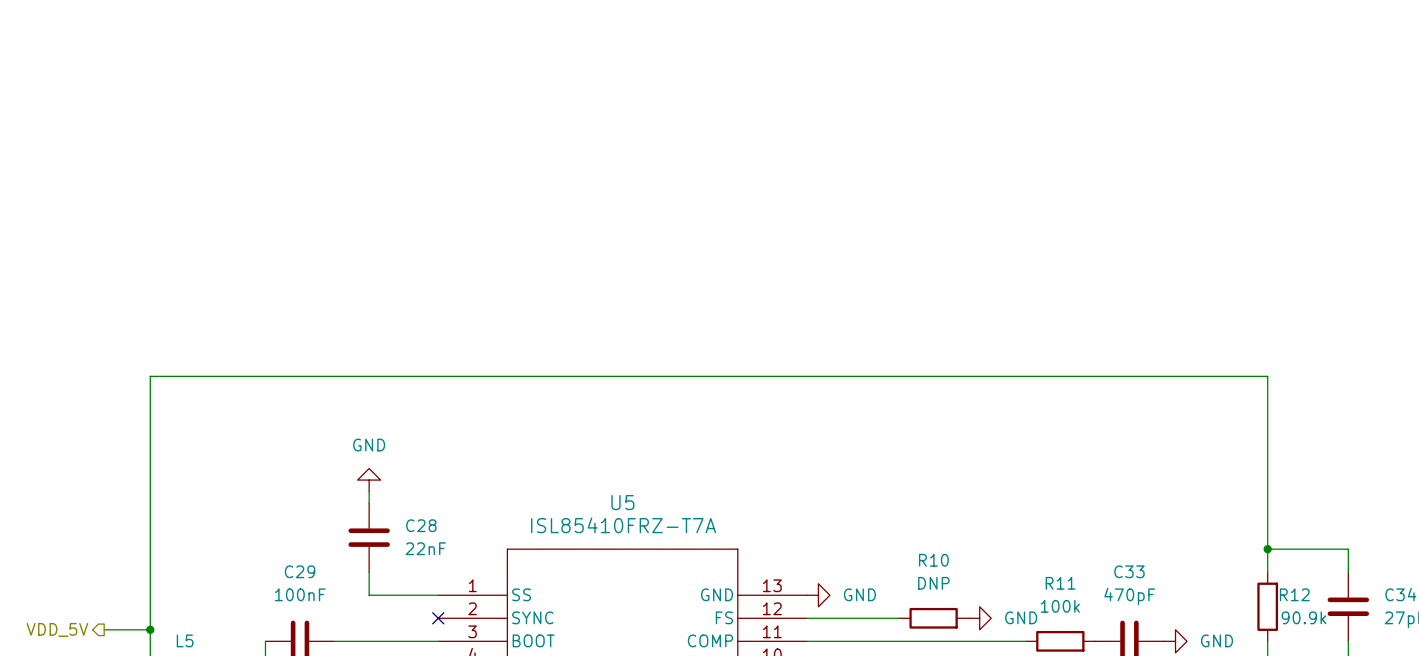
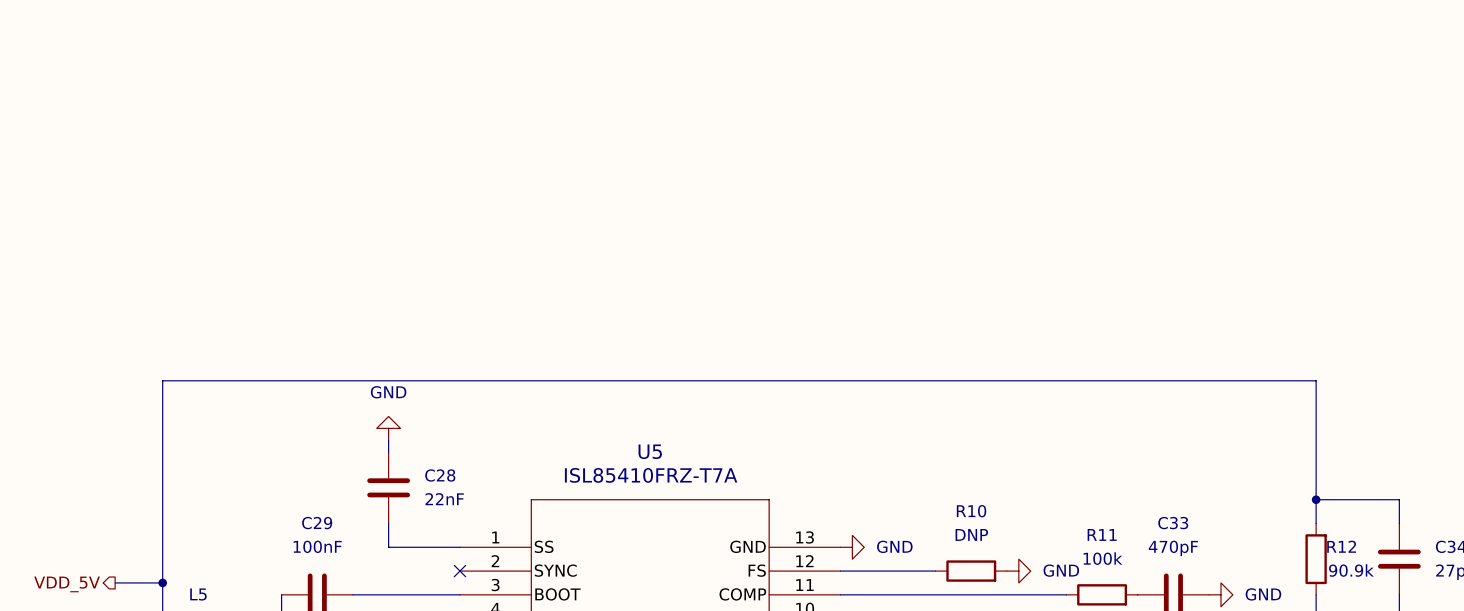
wire: (150, 433) (150, 376) (1267, 376) (1267, 433) -> (162, 380) (1316, 380)

